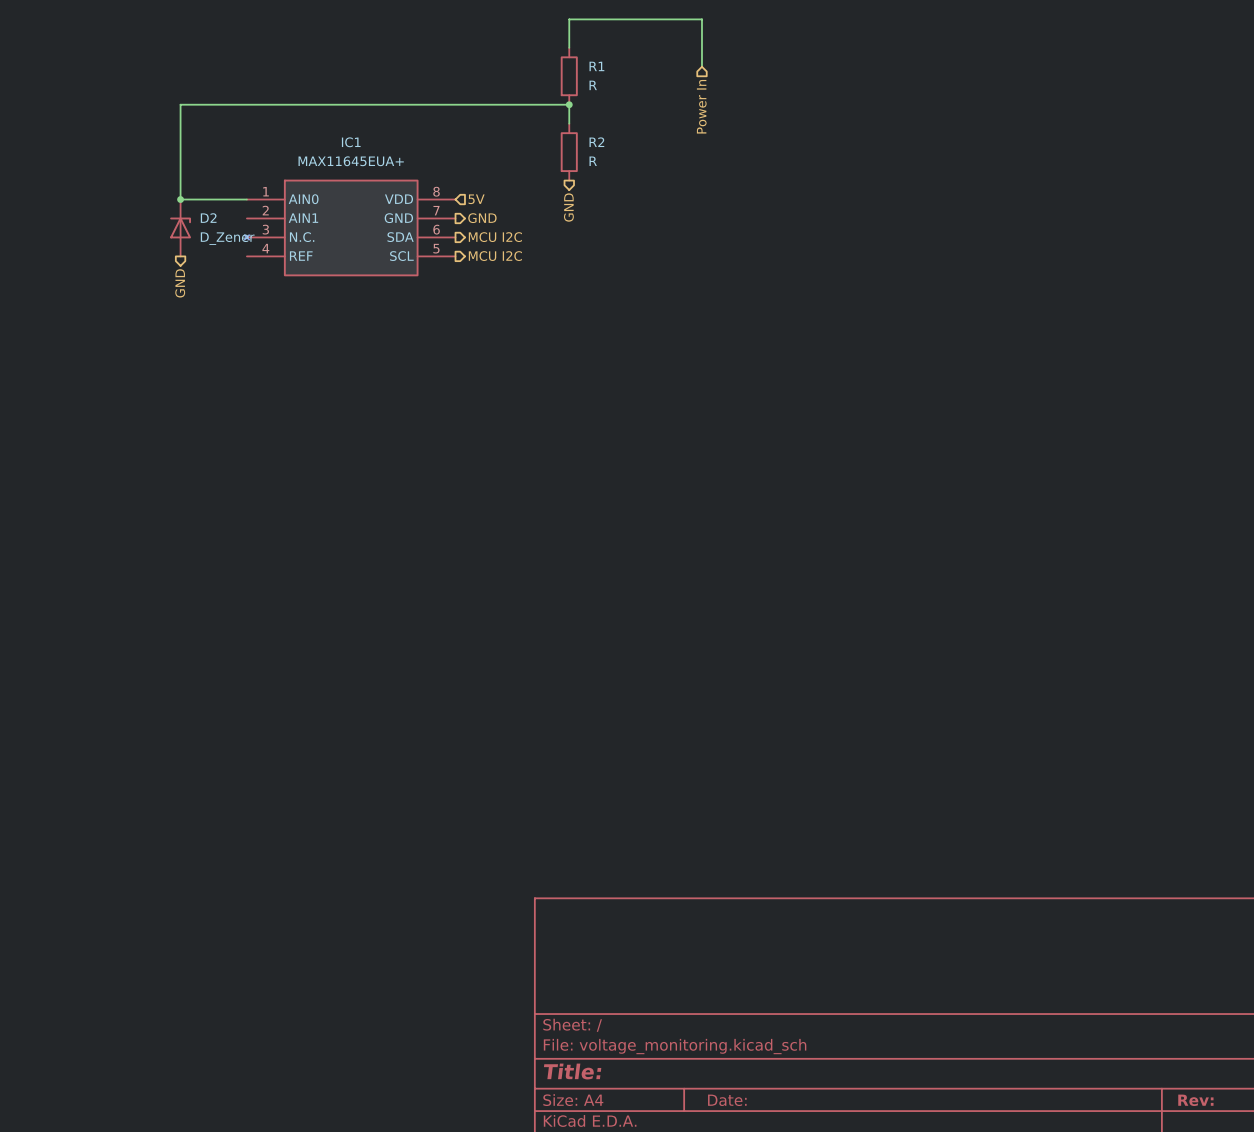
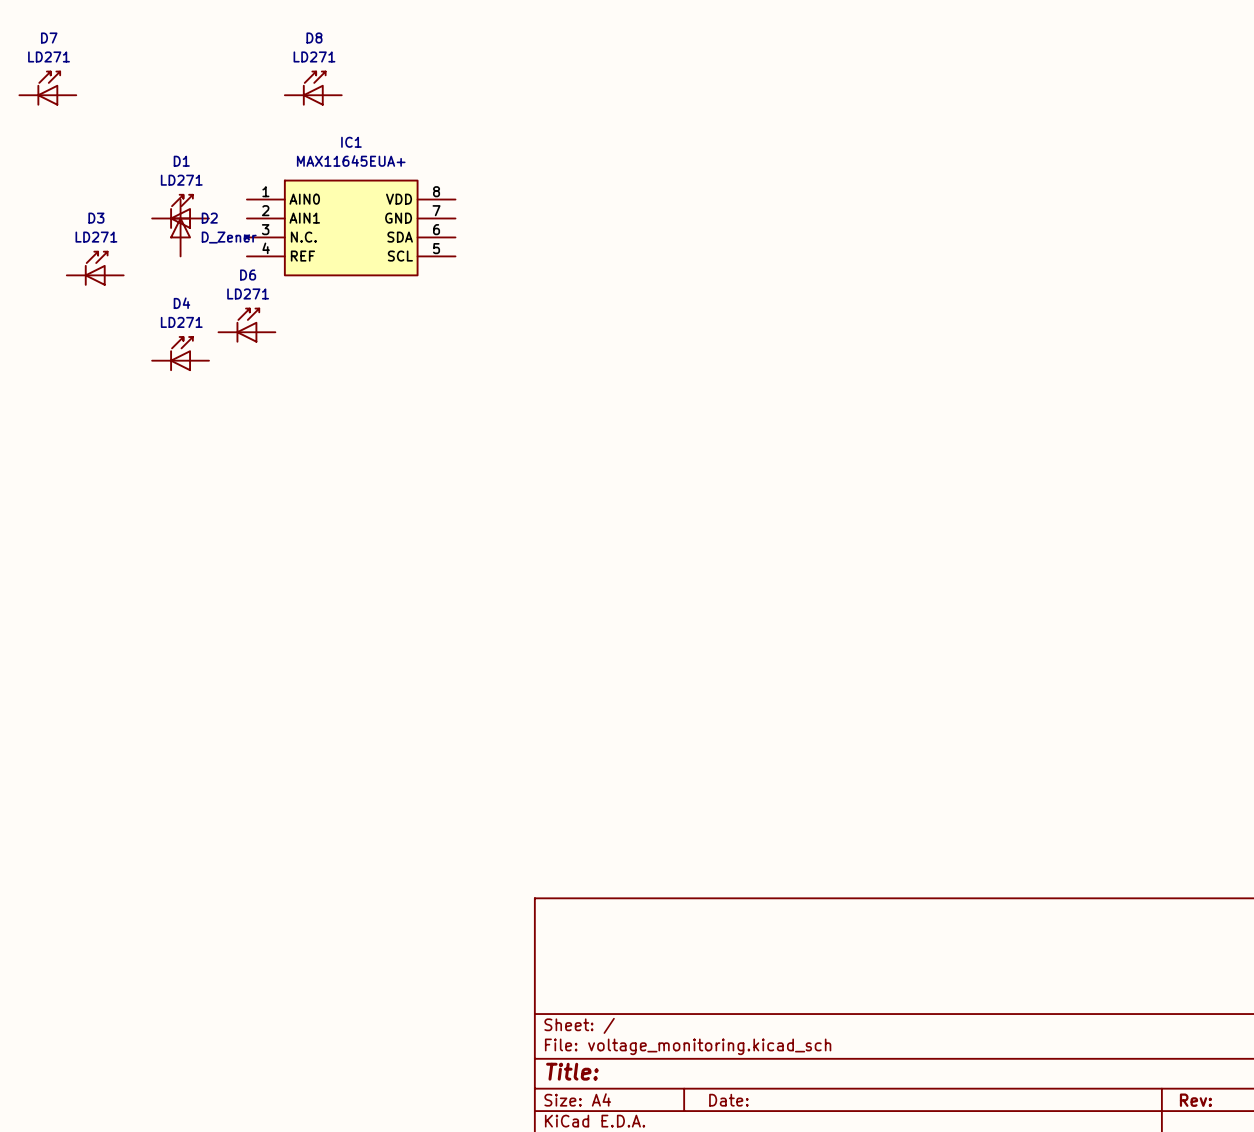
wire: (569, 47) (569, 19) (701, 19) (701, 66) -> none
R1: R (569, 76) -> none
D7: none -> LD271 (47, 88)
D8: none -> LD271 (313, 88)
junction: (569, 104) -> none
hierarchical label: Power In (701, 106) -> none
wire: (569, 123) (569, 104) (180, 104) (180, 199) (246, 199) -> none
R2: R (569, 152) -> none
junction: (180, 199) -> none
hierarchical label: 5V (476, 199) -> none
hierarchical label: GND (568, 207) -> none
D1: none -> LD271 (180, 211)
hierarchical label: GND (482, 218) -> none
hierarchical label: MCU I2C (495, 237) -> none
hierarchical label: MCU I2C (495, 256) -> none
D3: none -> LD271 (95, 268)
hierarchical label: GND (180, 283) -> none
D6: none -> LD271 (246, 325)
D4: none -> LD271 (180, 354)

